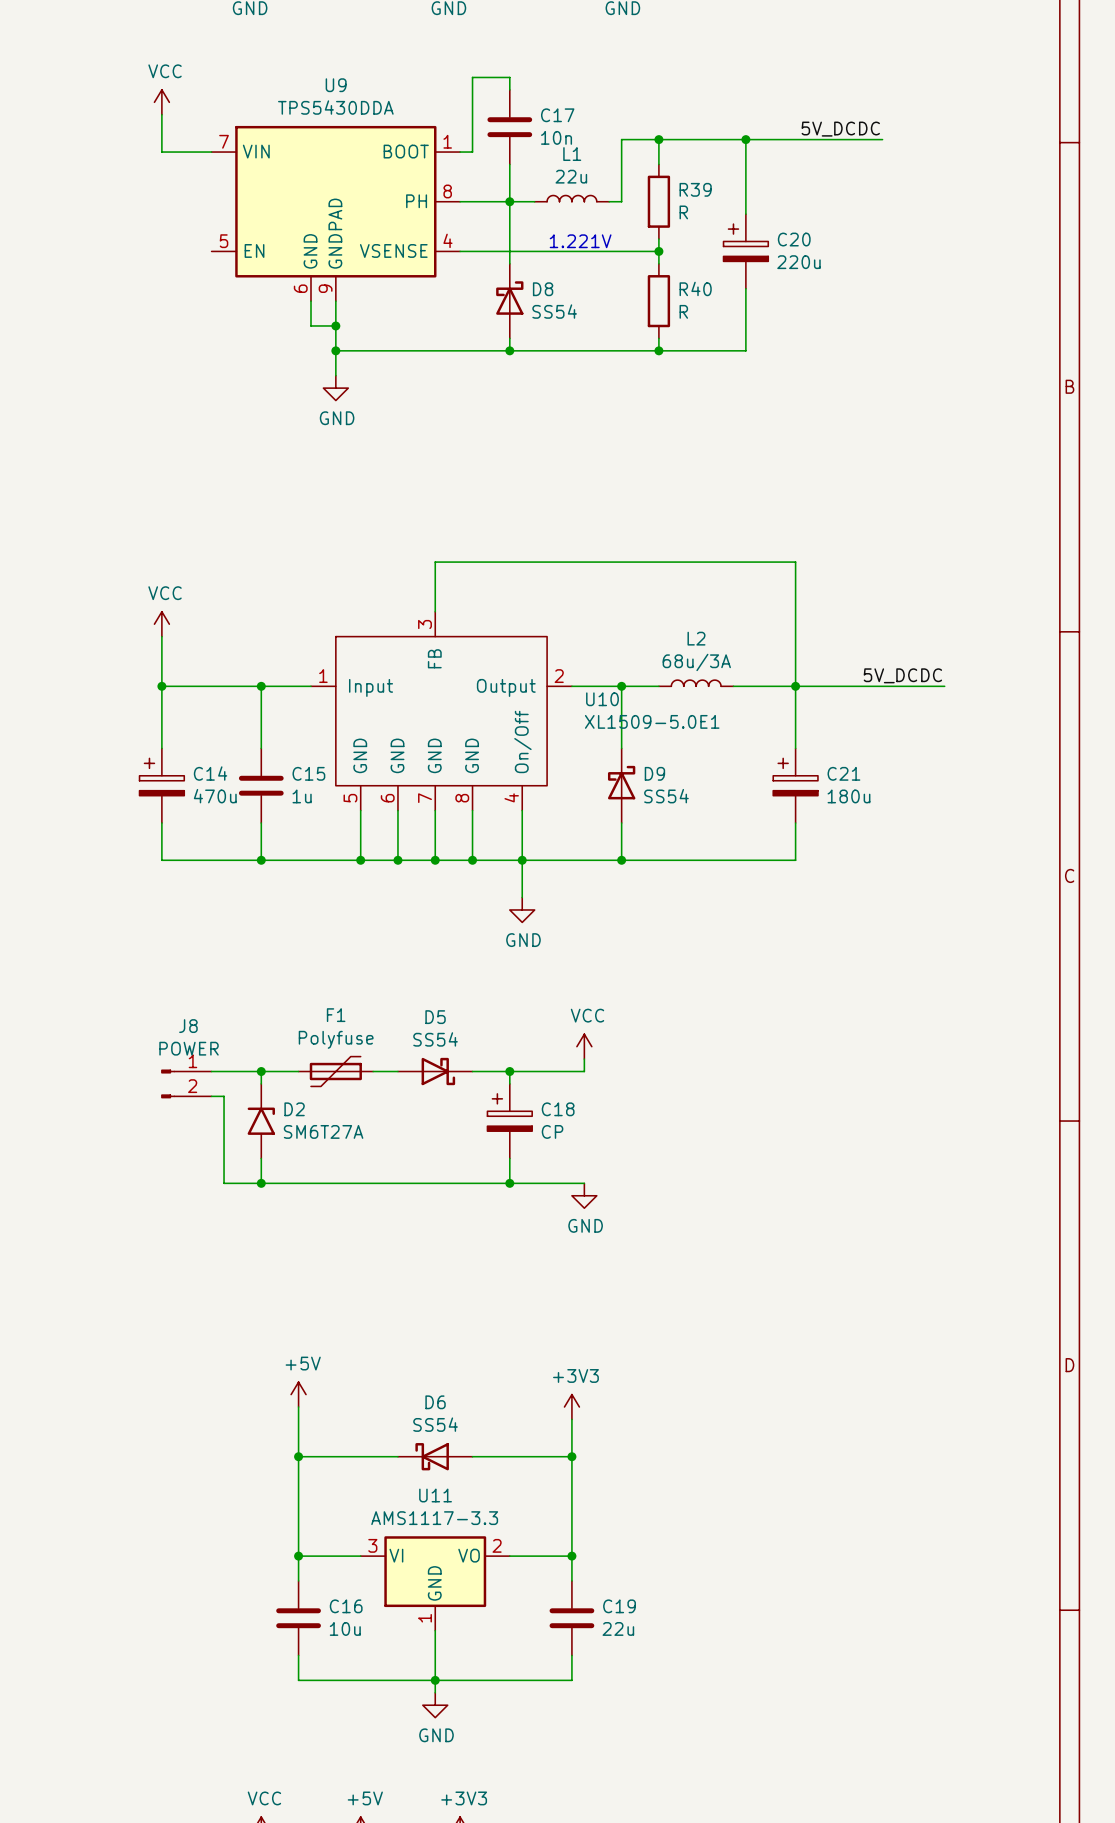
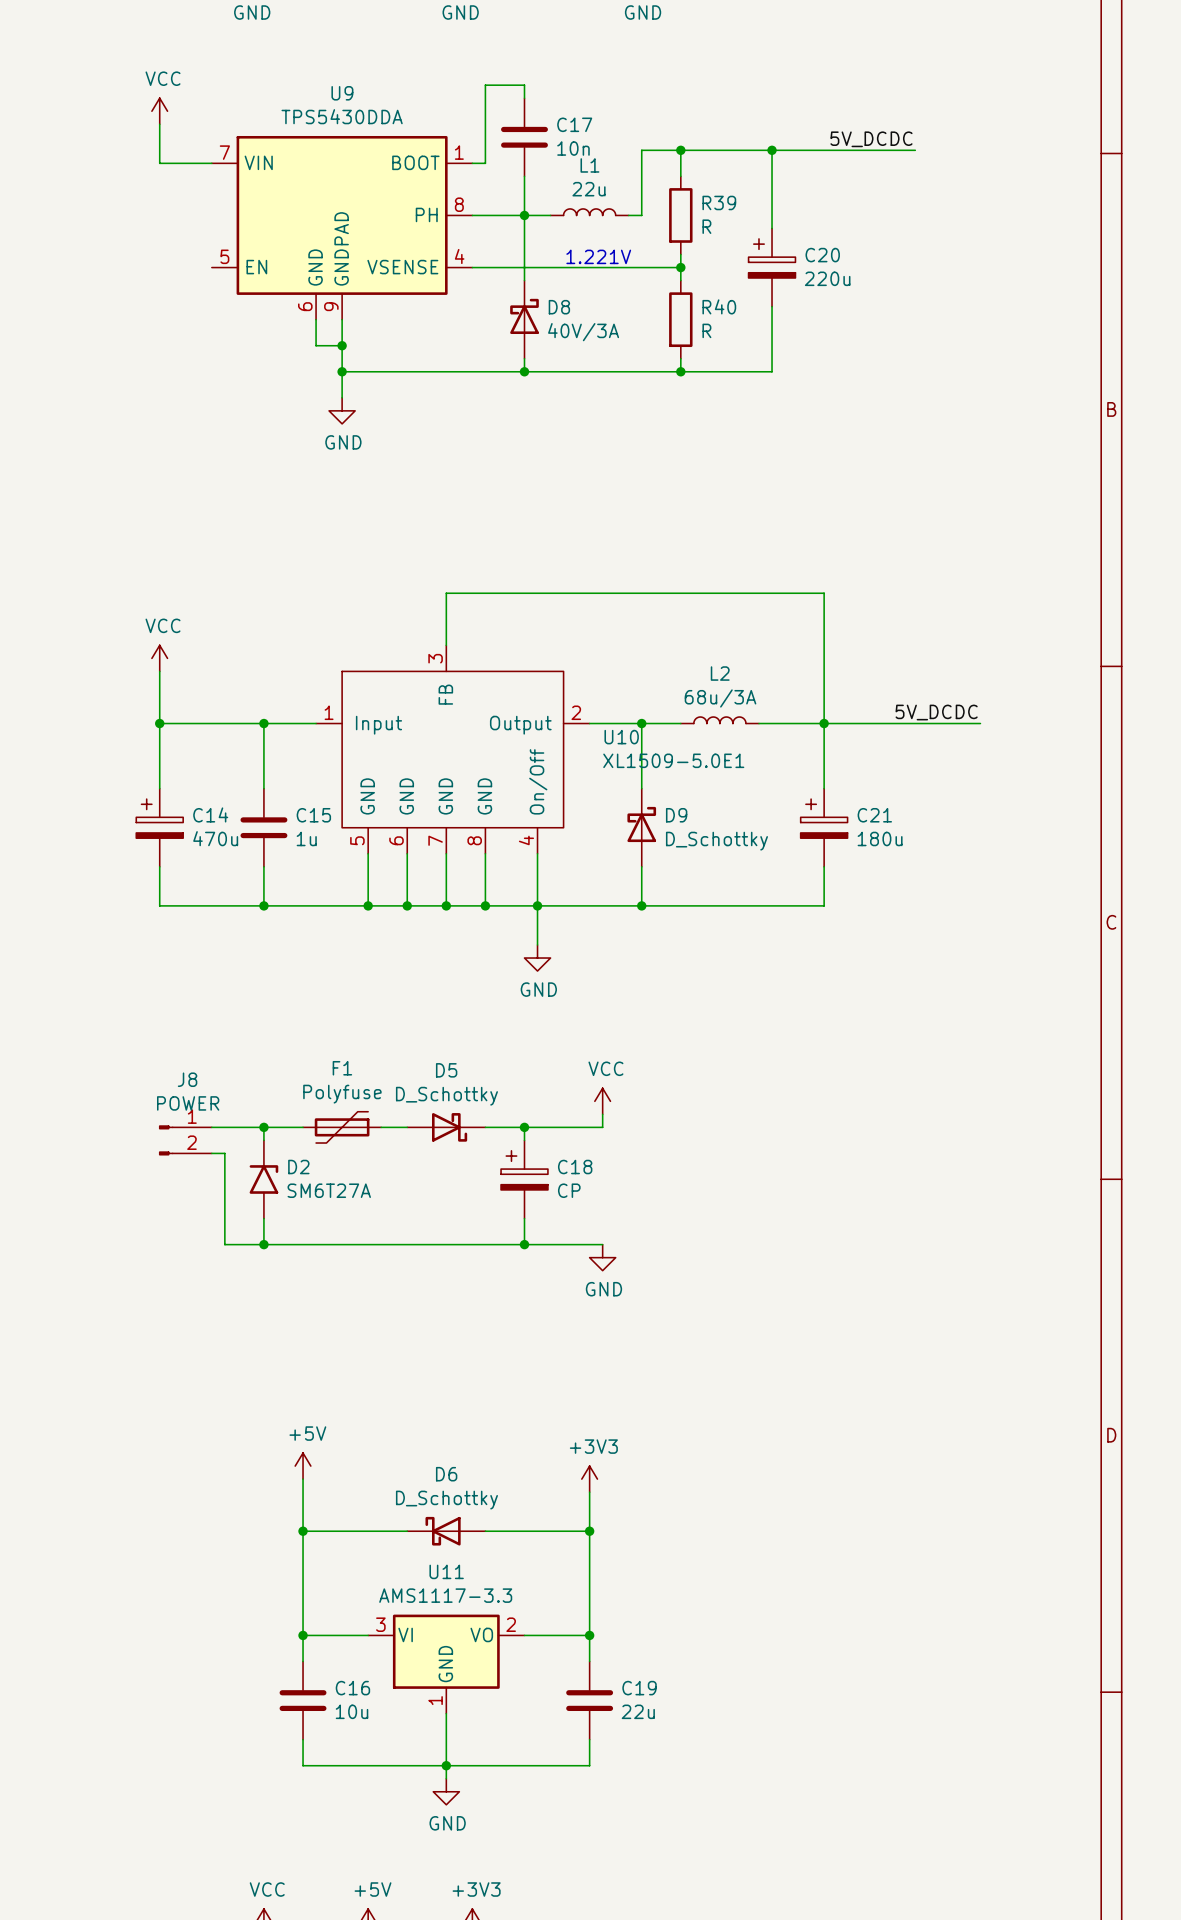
D8 value: SS54 (554, 311) -> 40V/3A (583, 332)
D9 value: SS54 (666, 796) -> D_Schottky (716, 841)
D5 value: SS54 (435, 1039) -> D_Schottky (446, 1096)
D6 value: SS54 (435, 1424) -> D_Schottky (446, 1500)

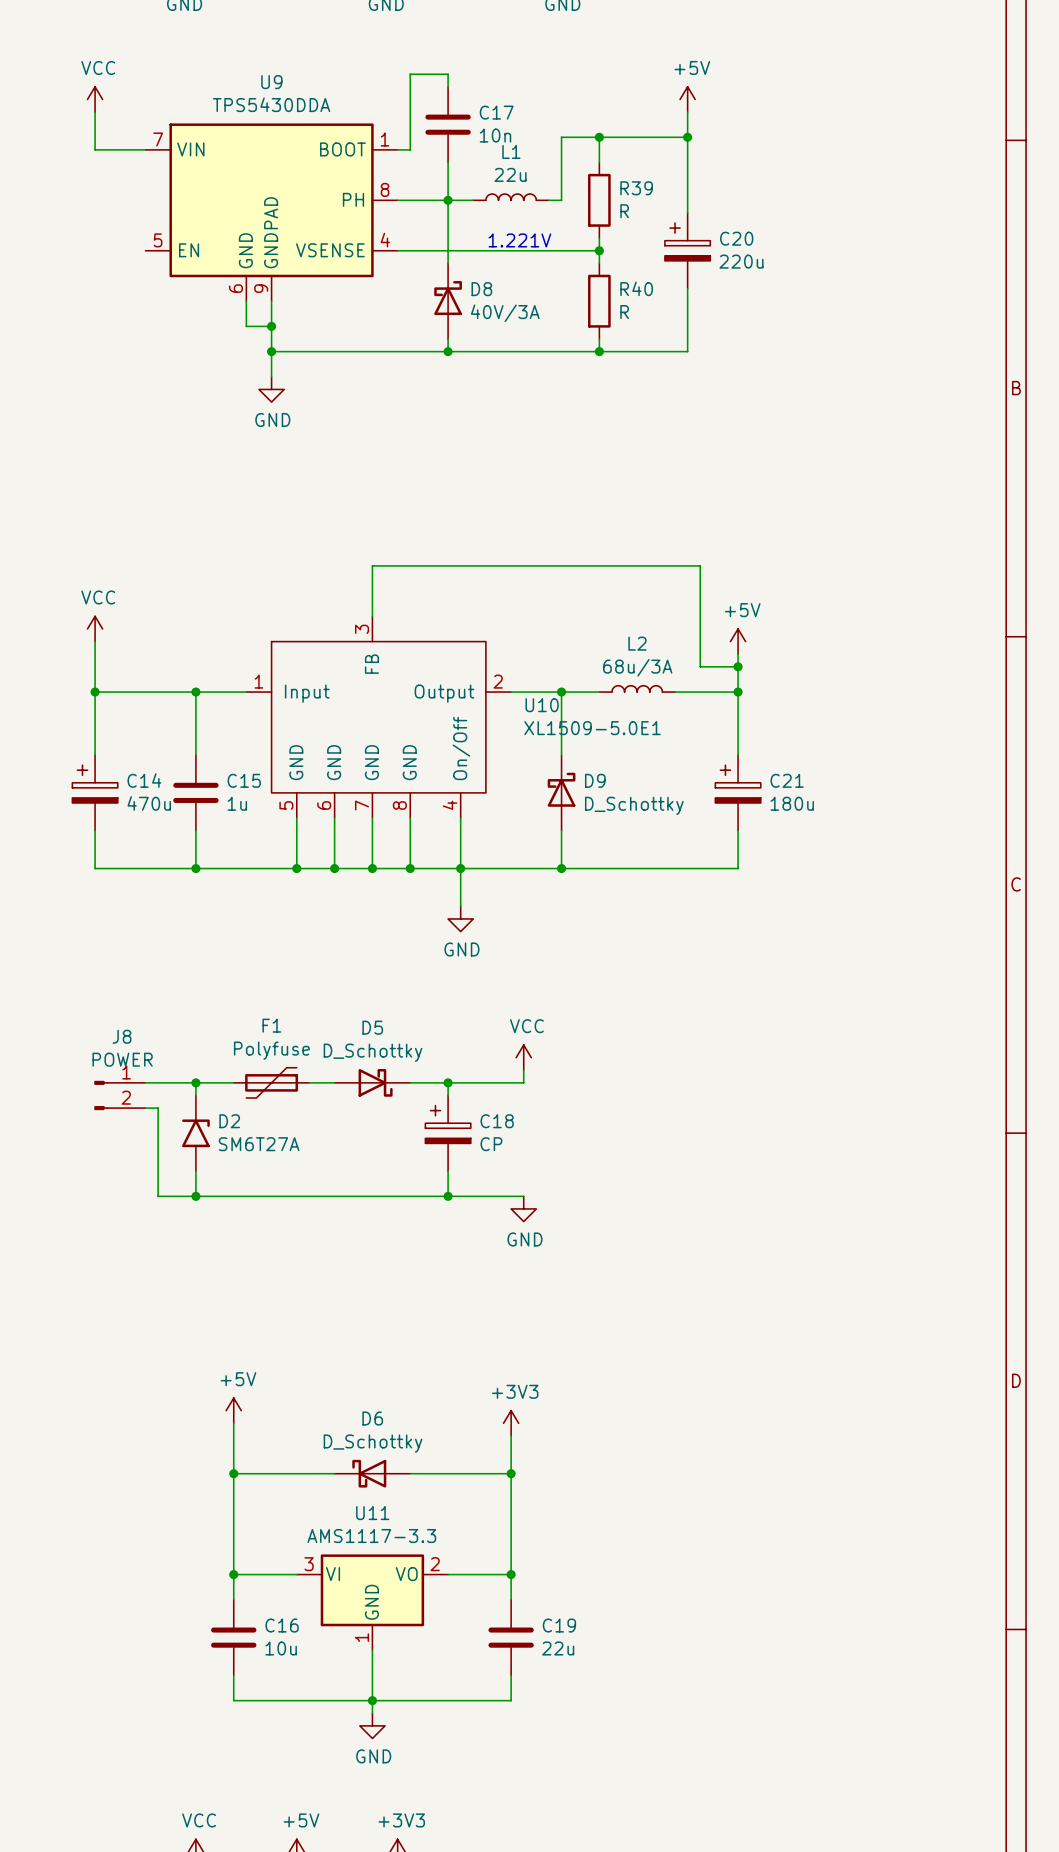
power symbol: none -> +5V (687, 99)
label: 5V_DCDC (871, 139) -> none
wire: (772, 150) (915, 150) -> (687, 137) (687, 112)
wire: (785, 593) (824, 593) (824, 684) -> (700, 565) (700, 666) (738, 666)
power symbol: none -> +5V (738, 641)
junction: none -> (738, 666)
label: 5V_DCDC (936, 712) -> none
wire: (824, 723) (980, 723) -> none

